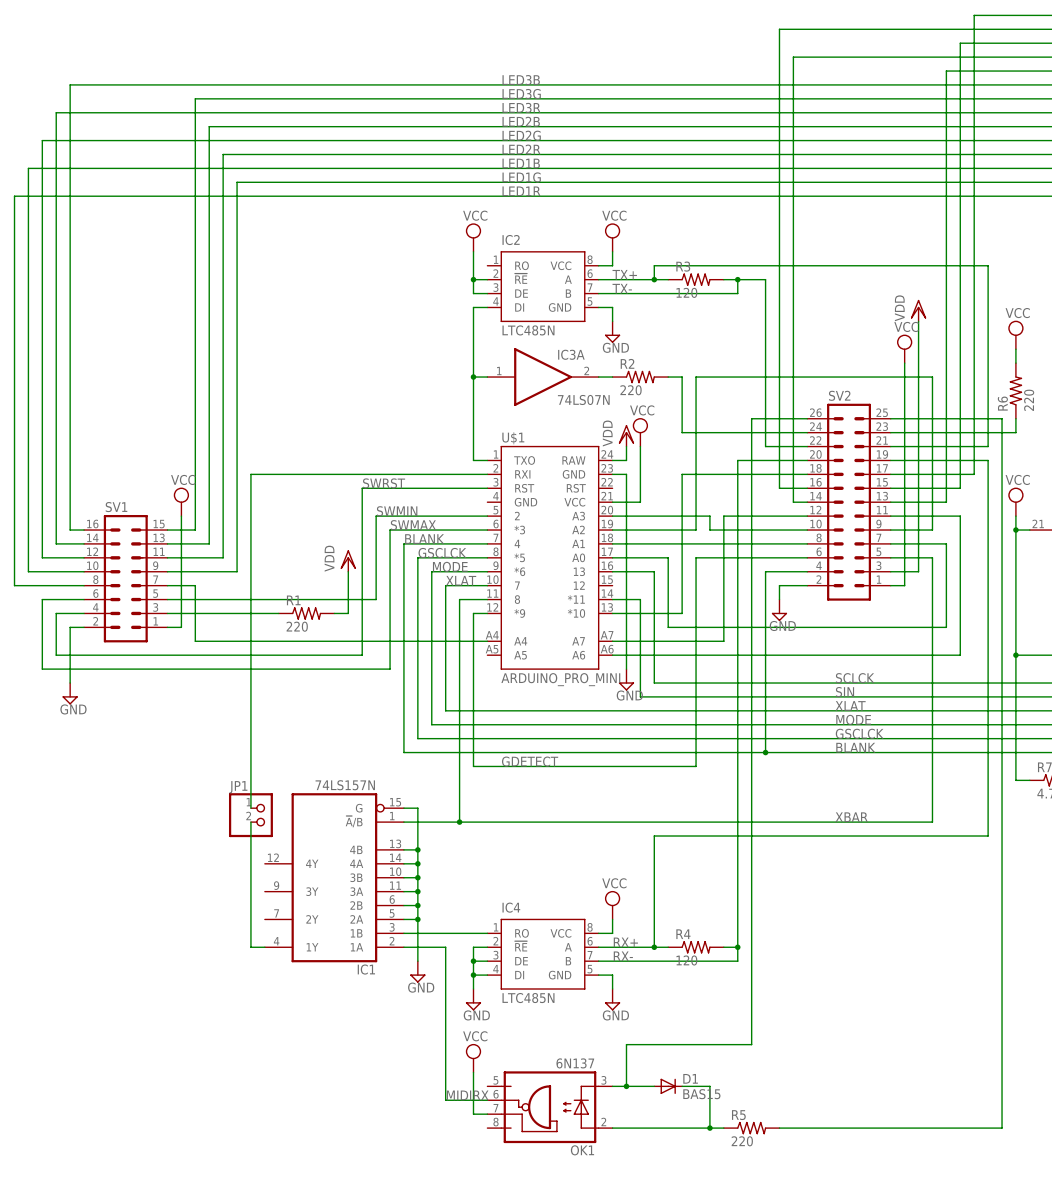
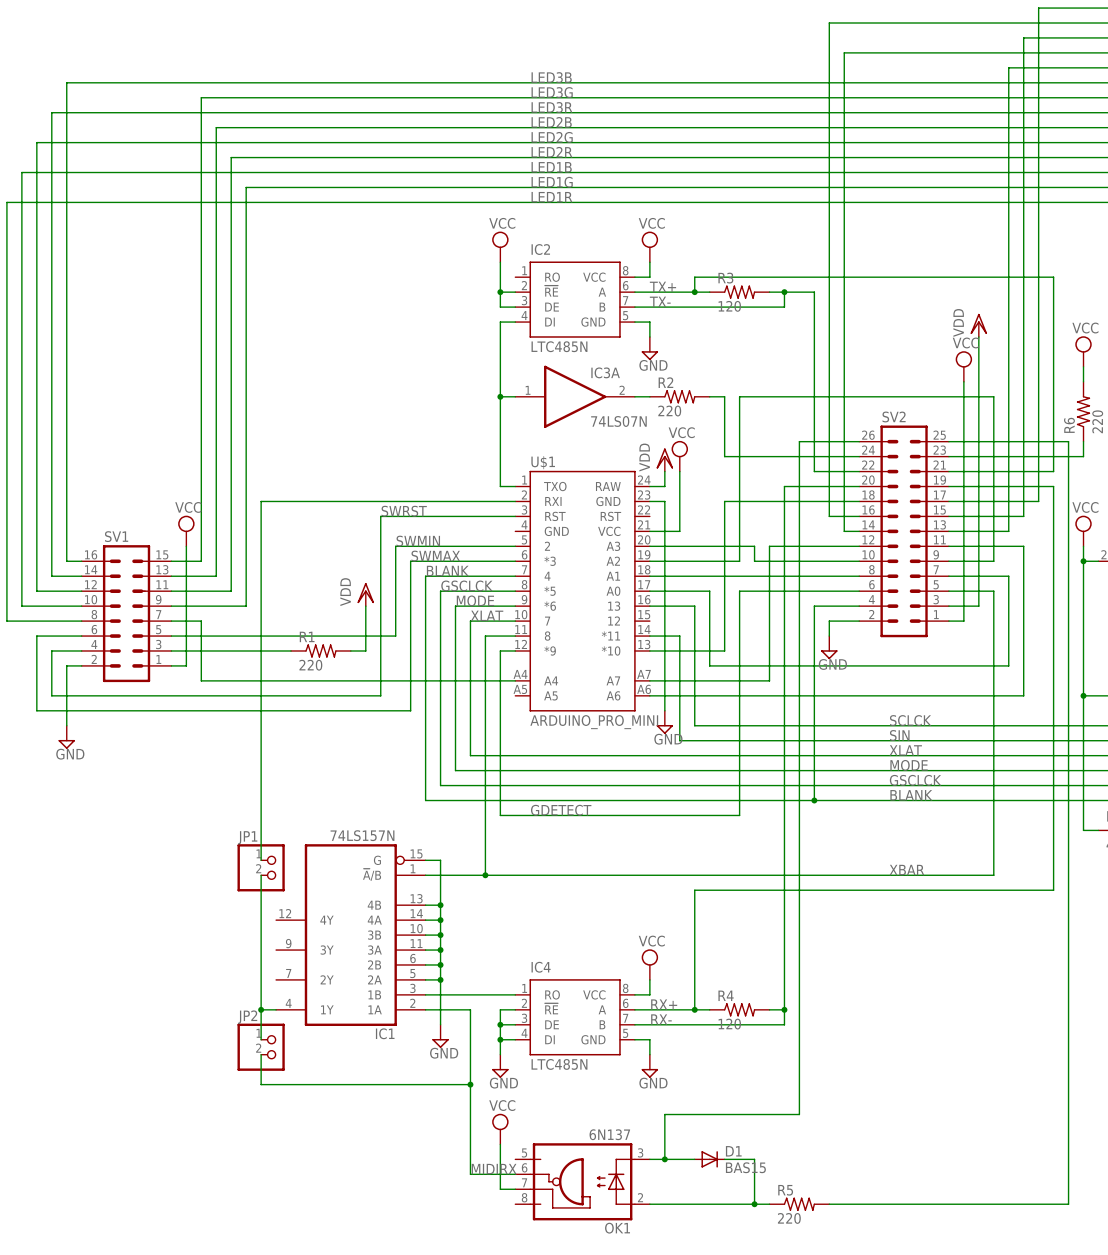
wire: none -> (261, 1009) (261, 1039)
junction: none -> (261, 1009)
JP2: none -> (261, 1047)
wire: none -> (261, 1054) (261, 1084) (470, 1084)
junction: none -> (470, 1084)

